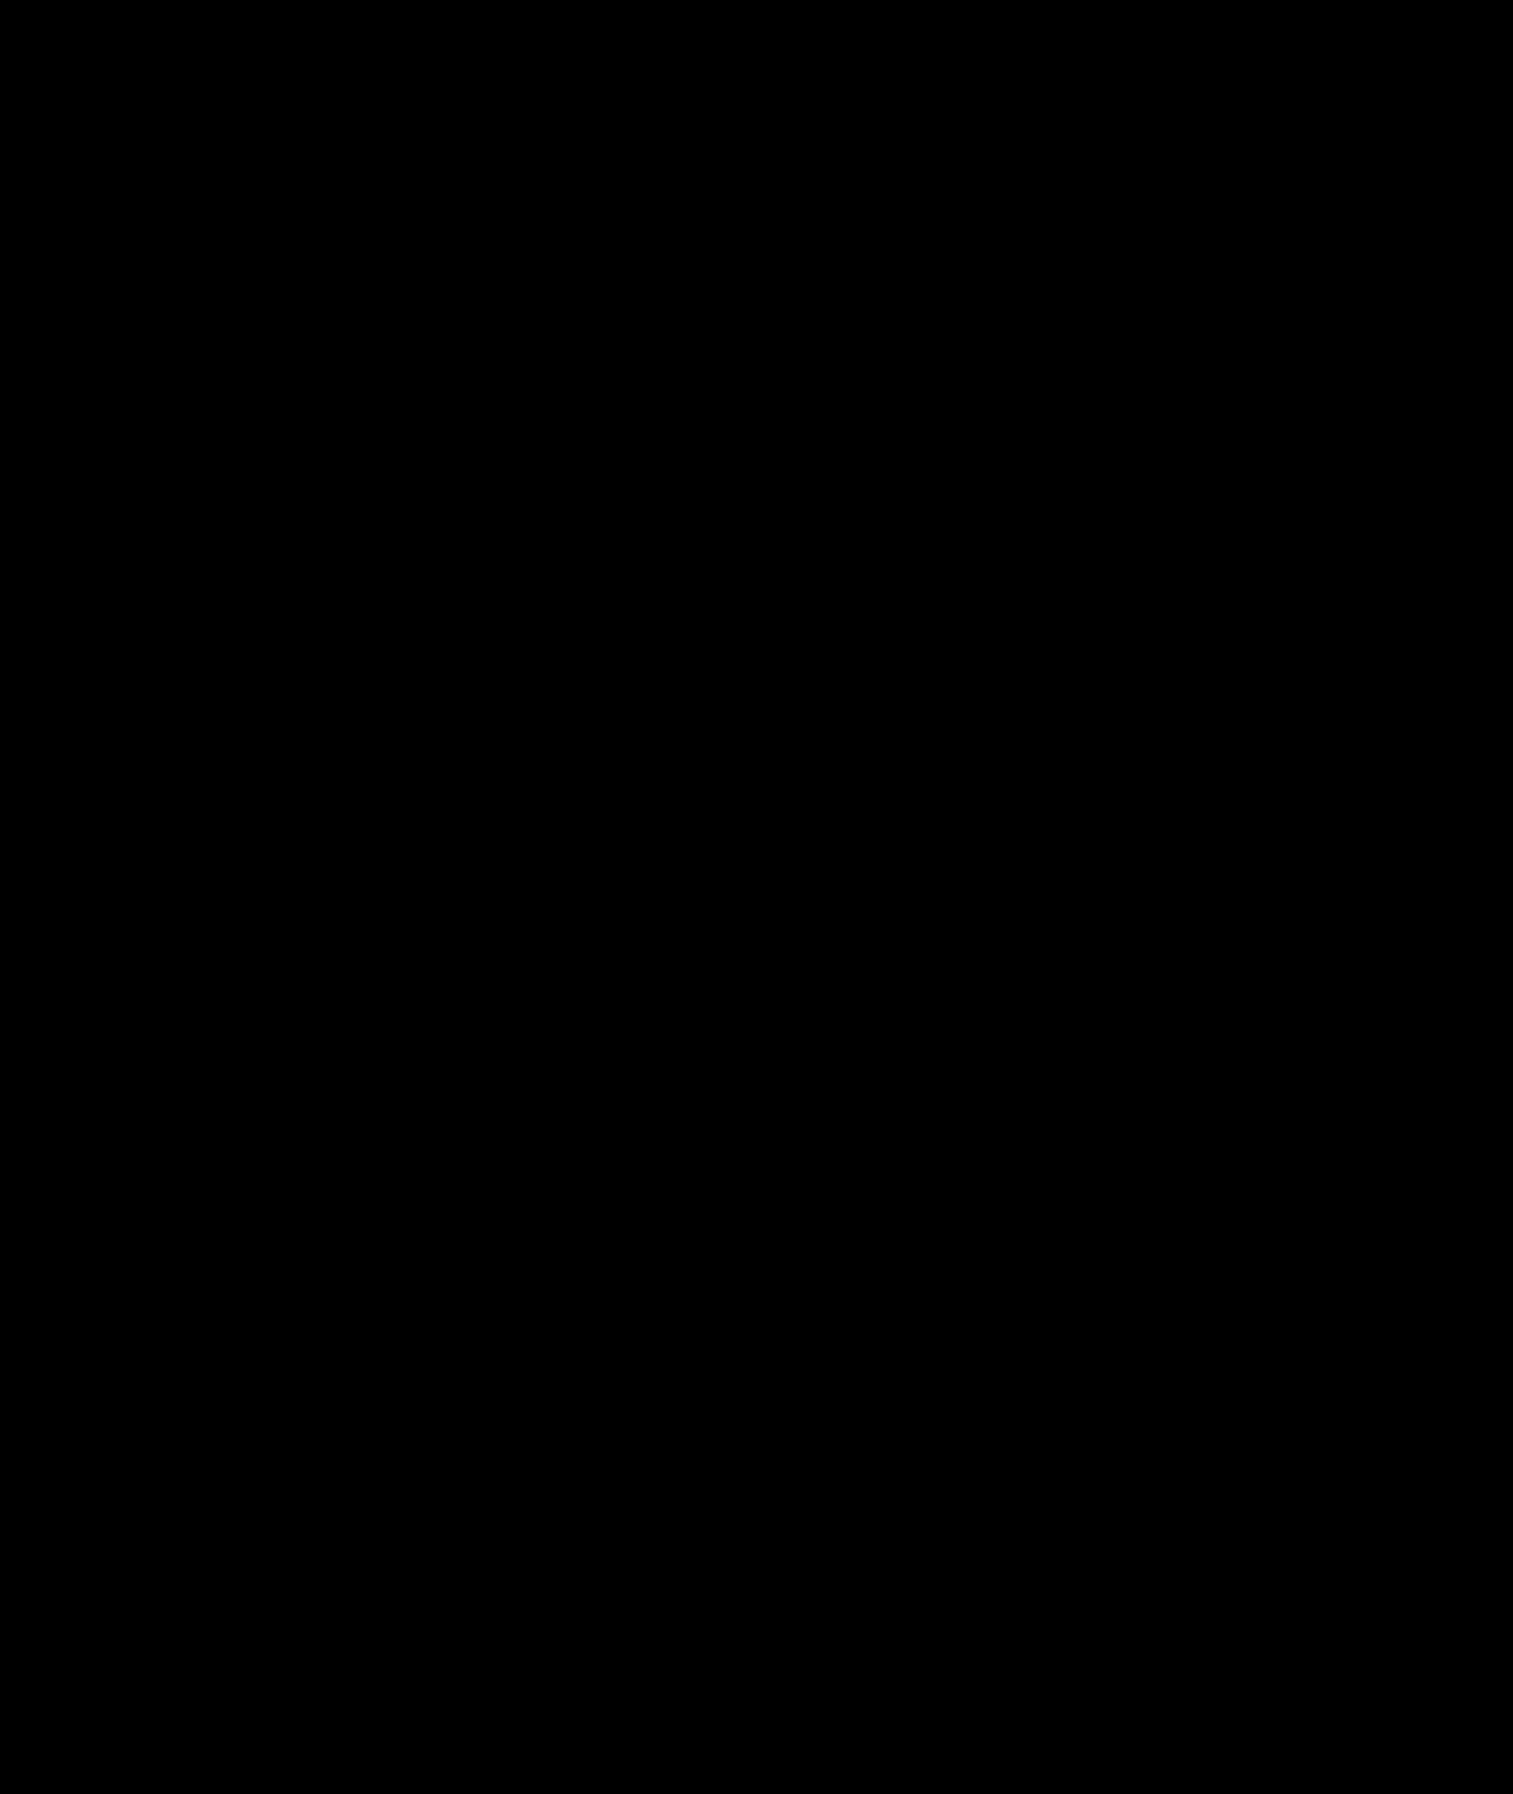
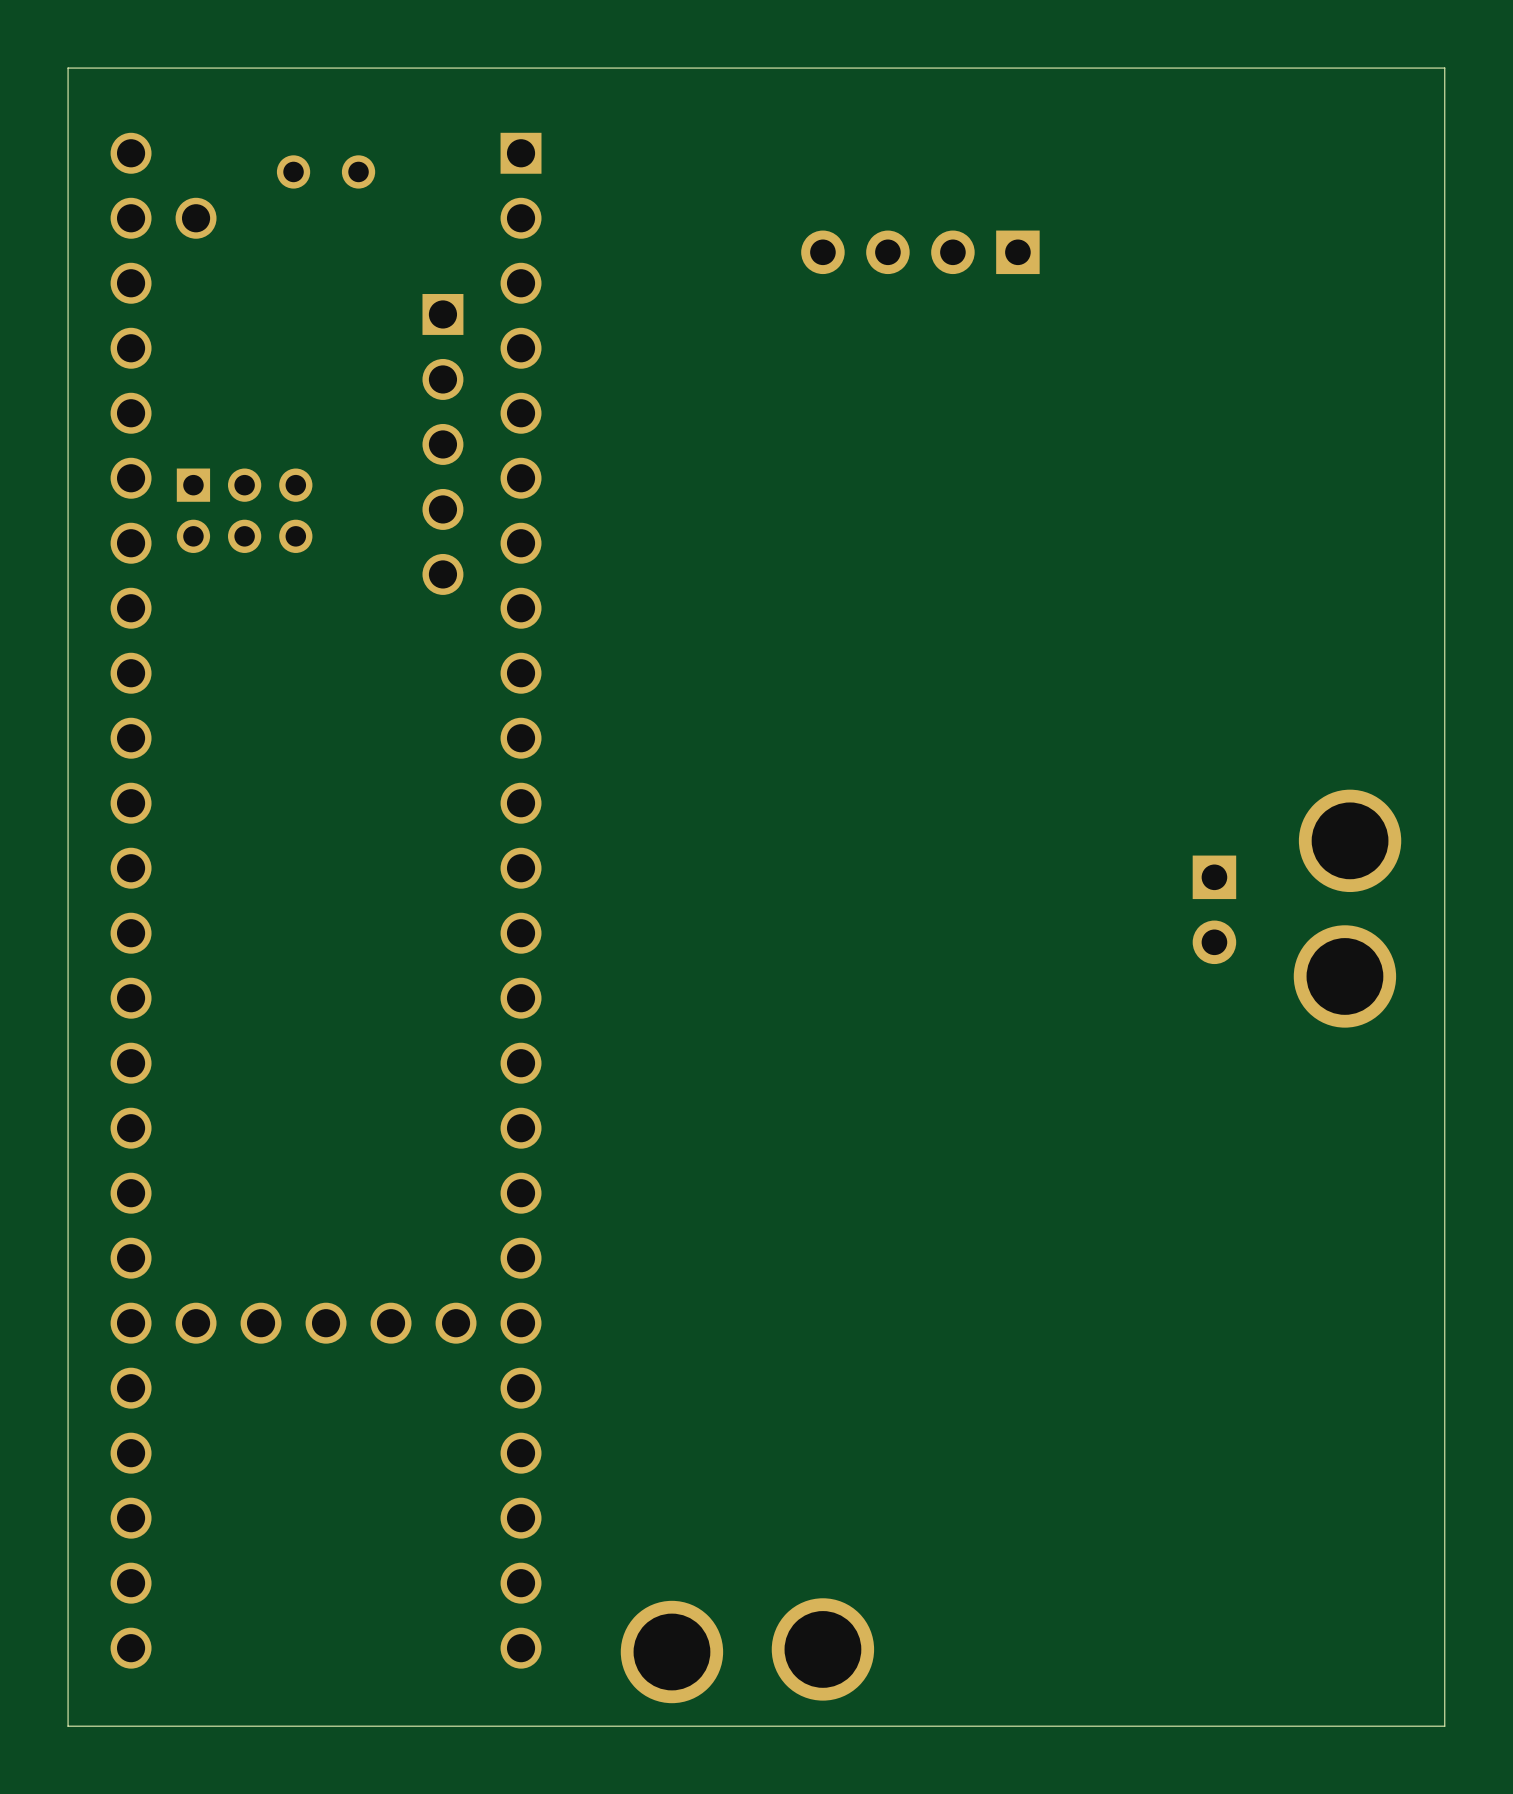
board edge: none -> (1444, 68) (68, 68) (68, 1726) (1444, 1726) (1444, 68)
part: none -> (920, 252)
part: none -> (1350, 840)
part: none -> (326, 900)
part: none -> (1214, 909)
part: none -> (1344, 976)
part: none -> (822, 1649)
part: none -> (671, 1652)

